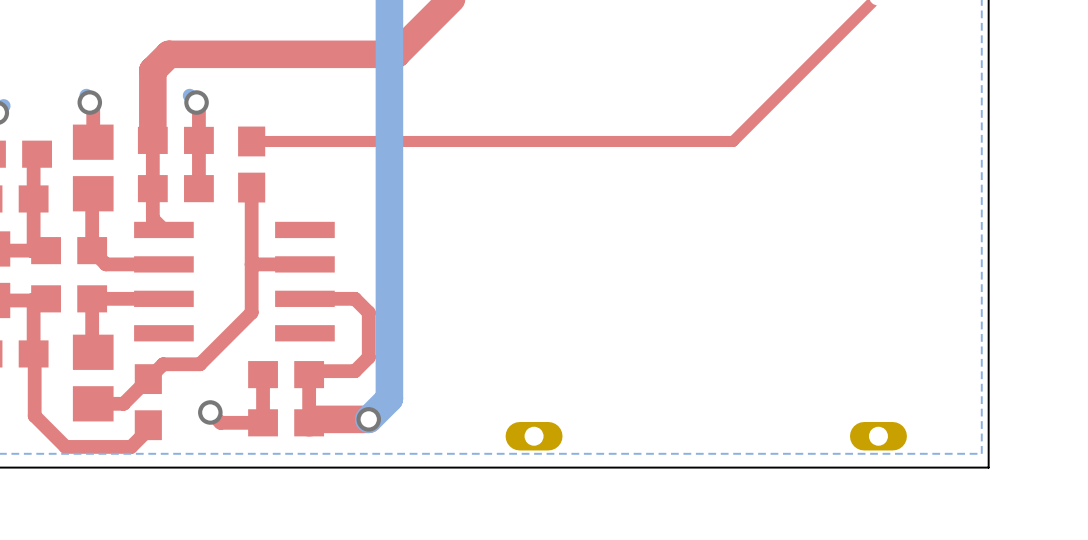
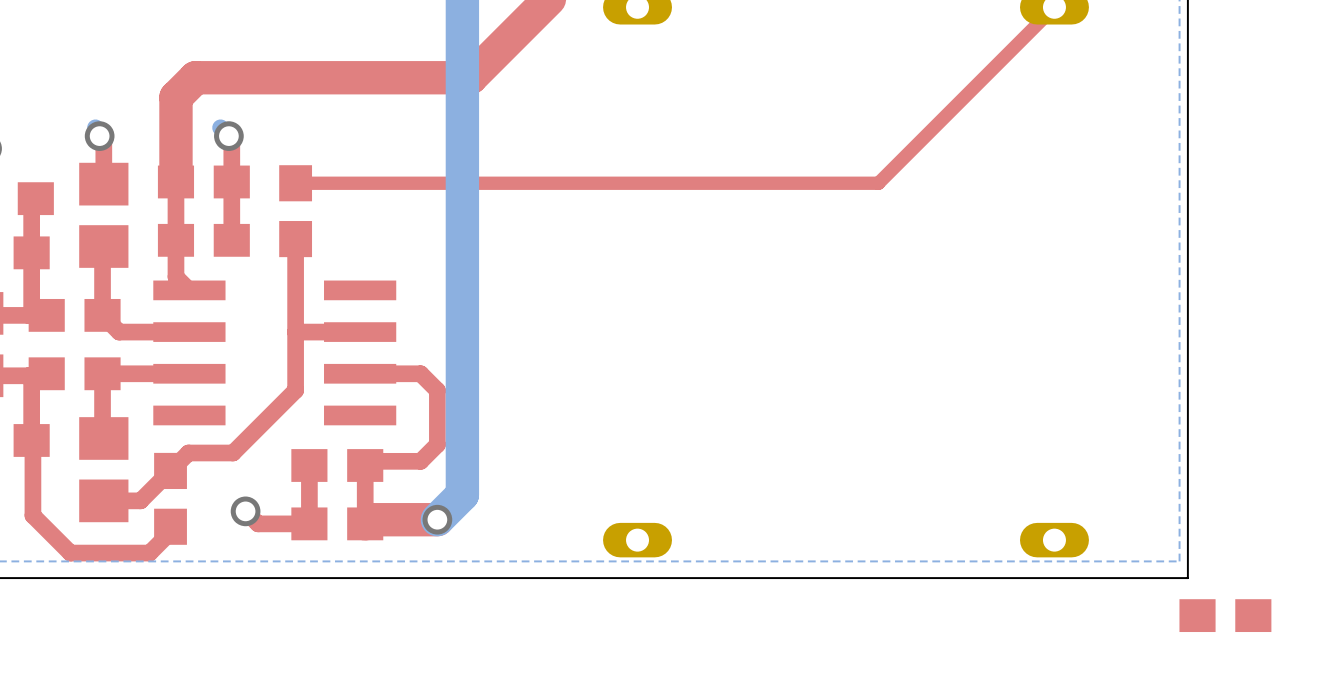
part: none -> (1225, 615)

